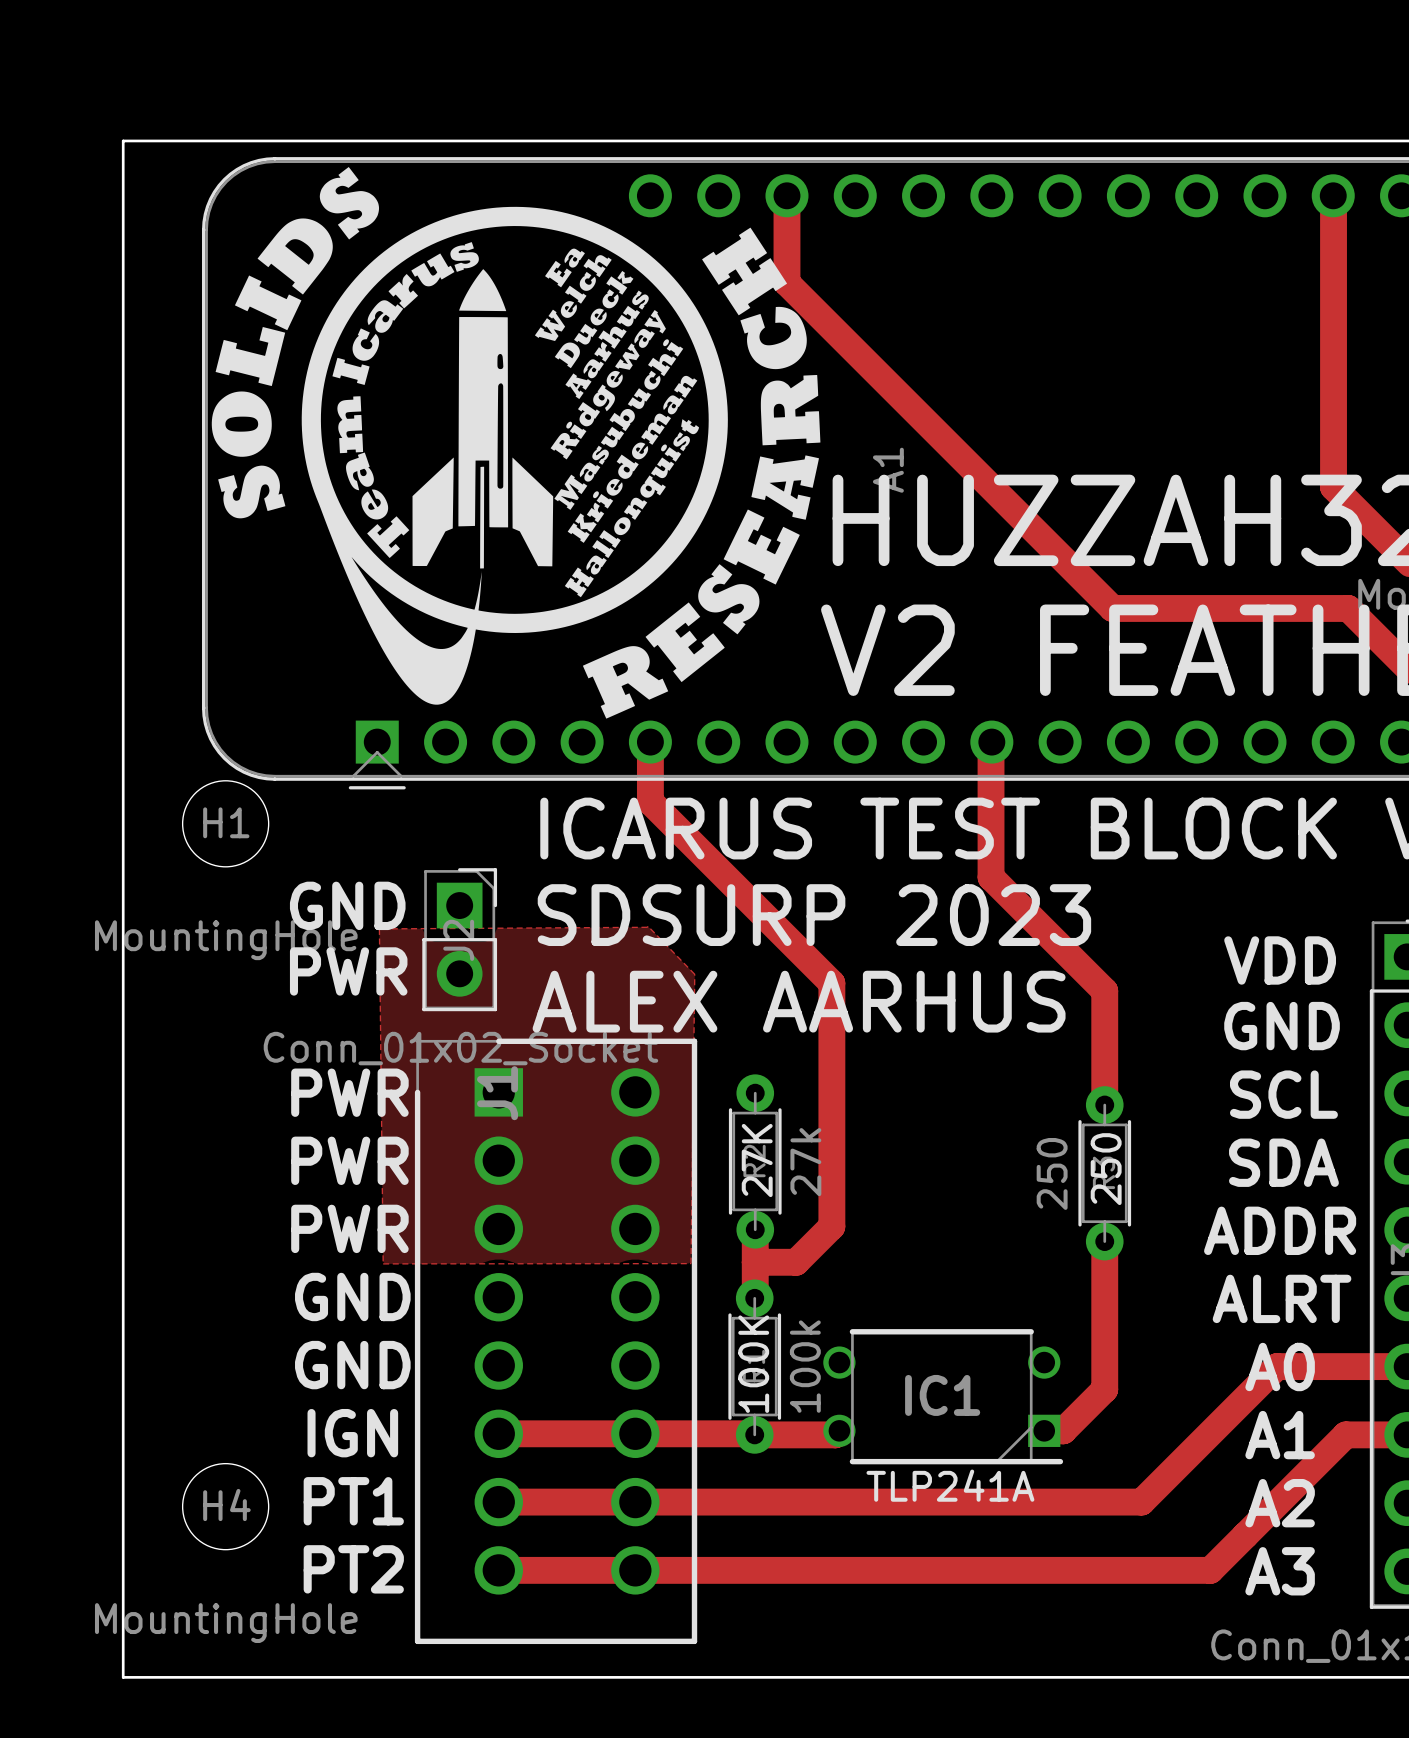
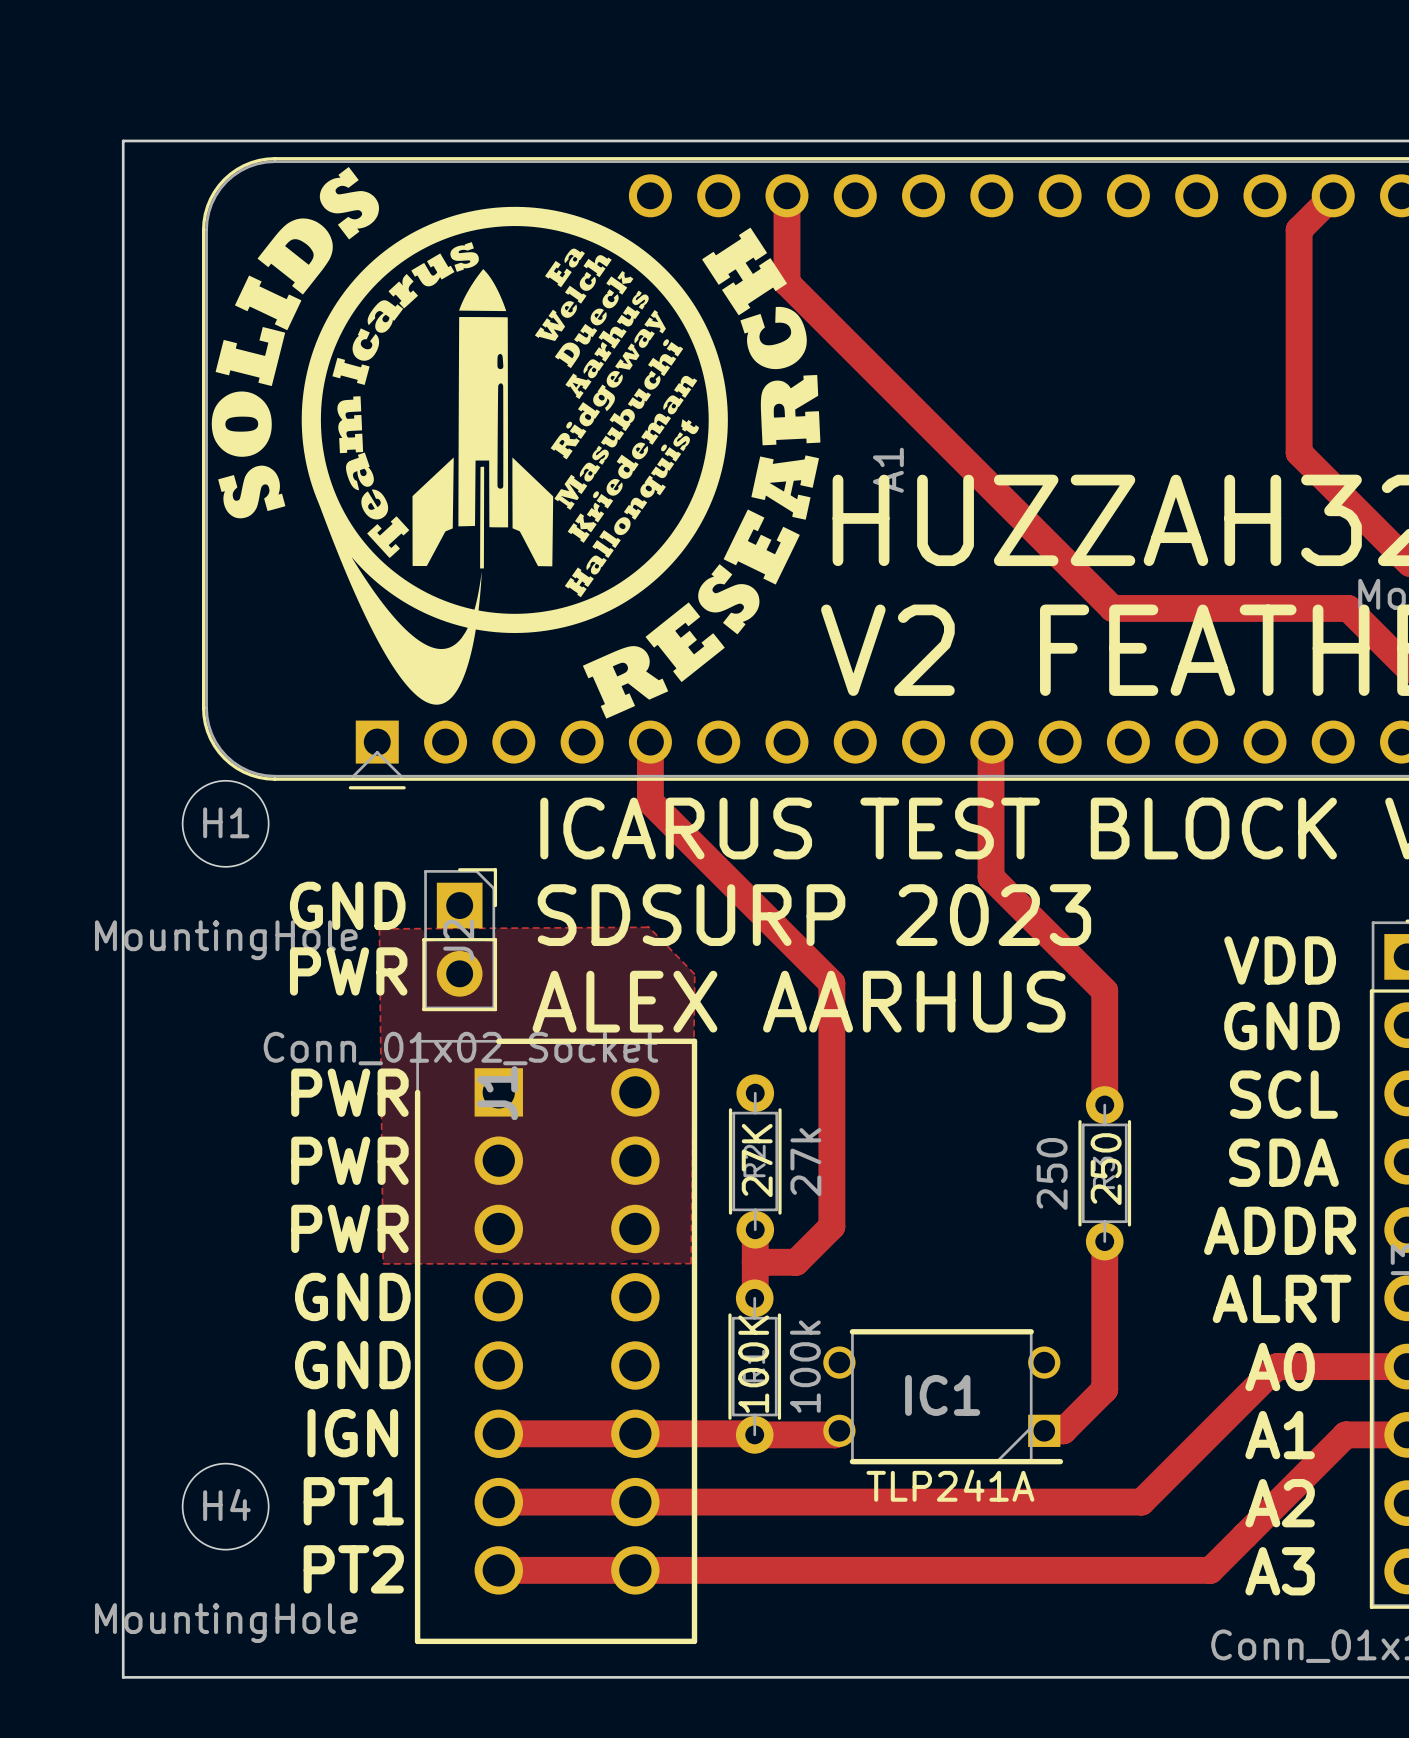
track: (1333, 196) (1333, 487) -> (1333, 195) (1299, 229) (1299, 452) (1333, 487)

